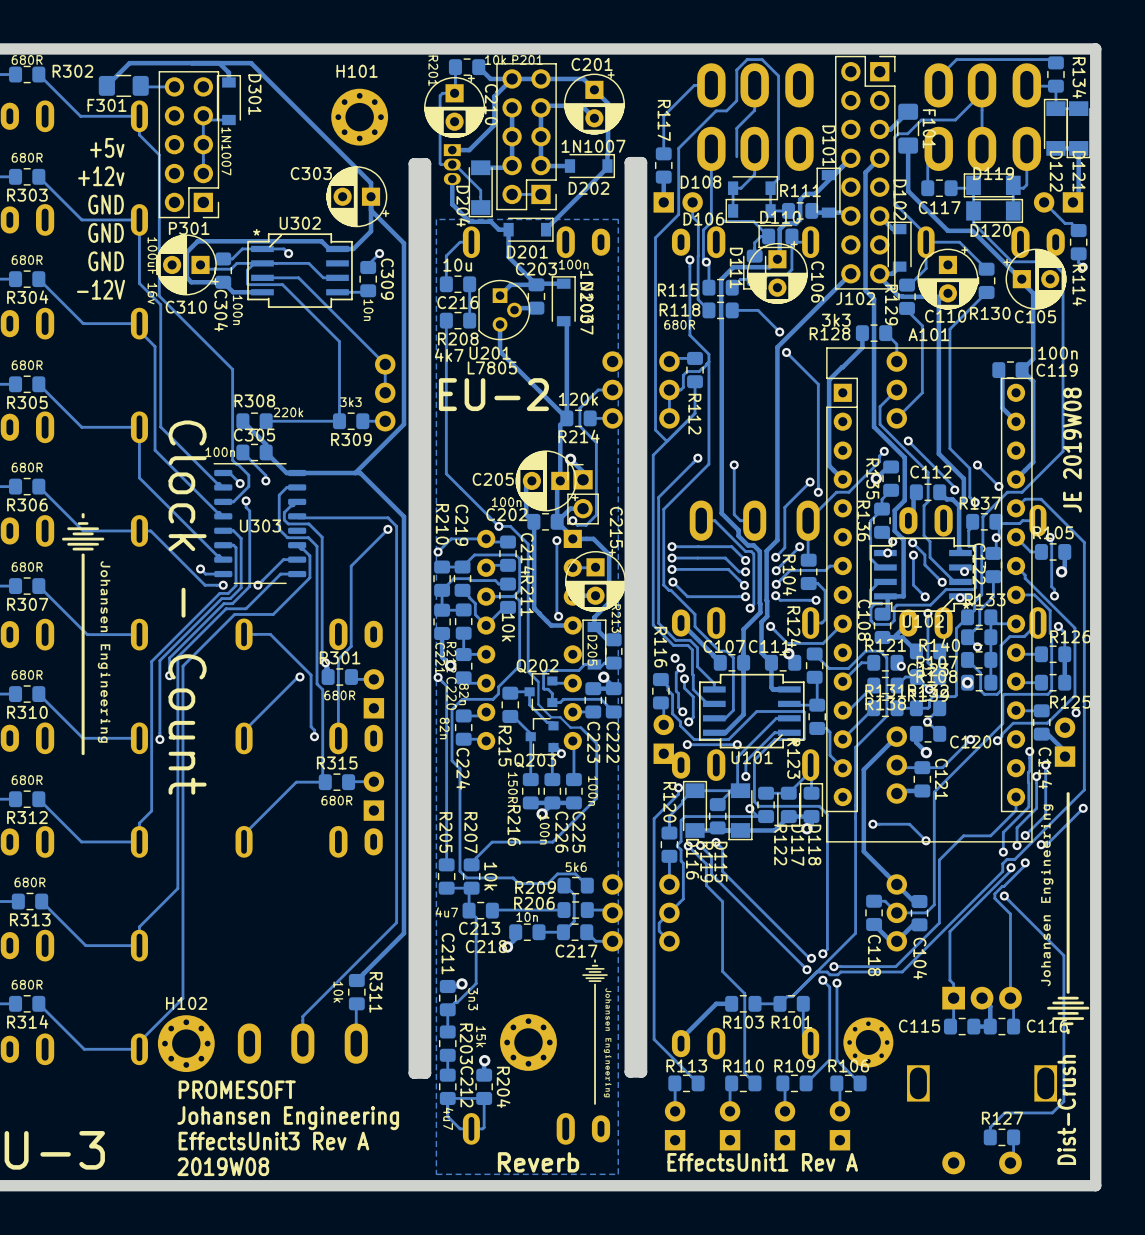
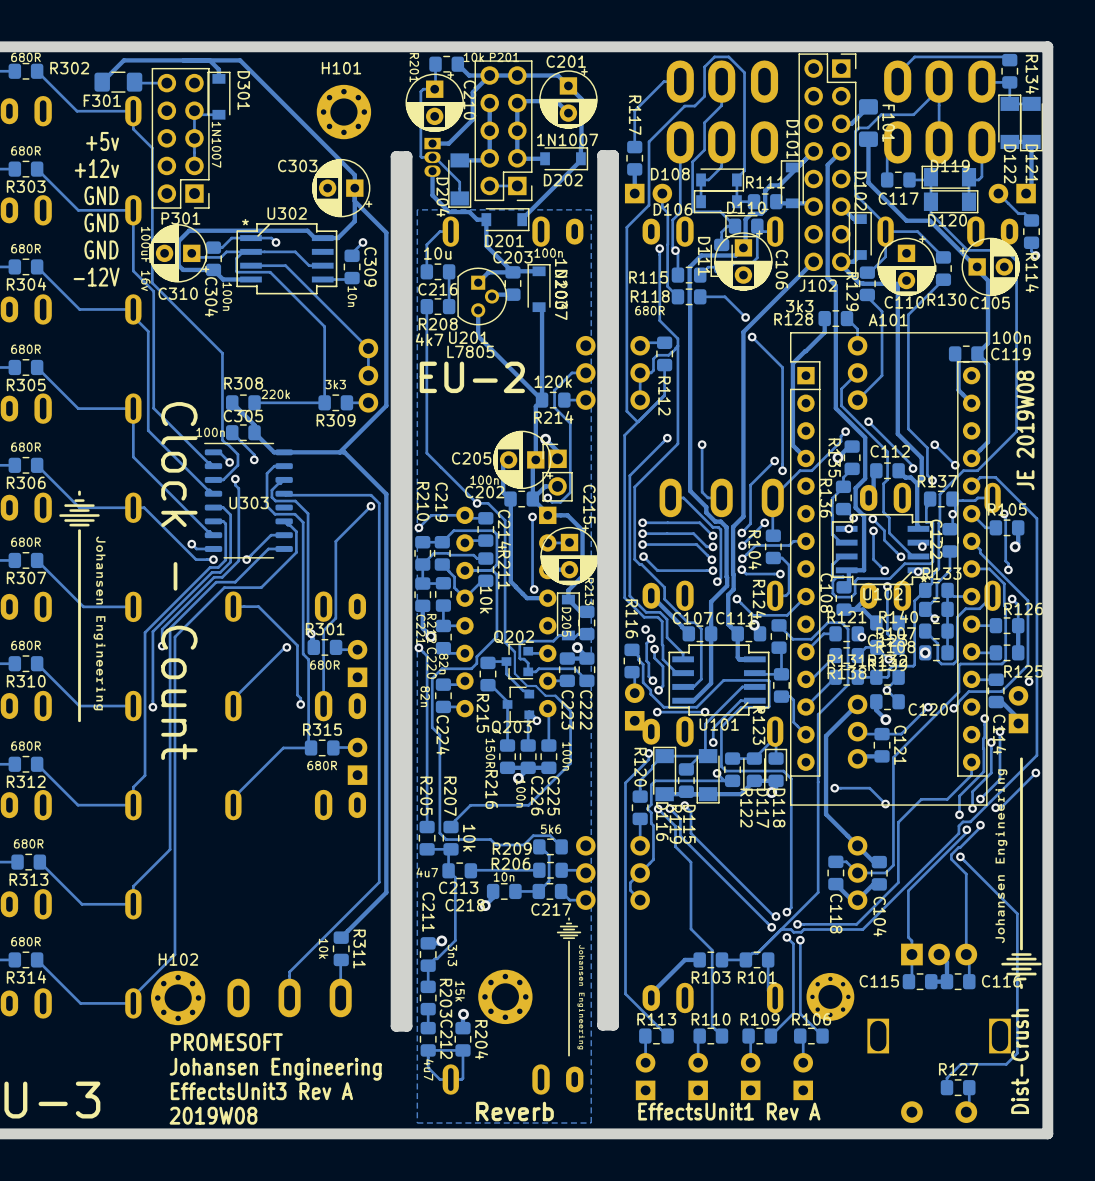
track: none -> (704, 150) (692, 161) (692, 211)

